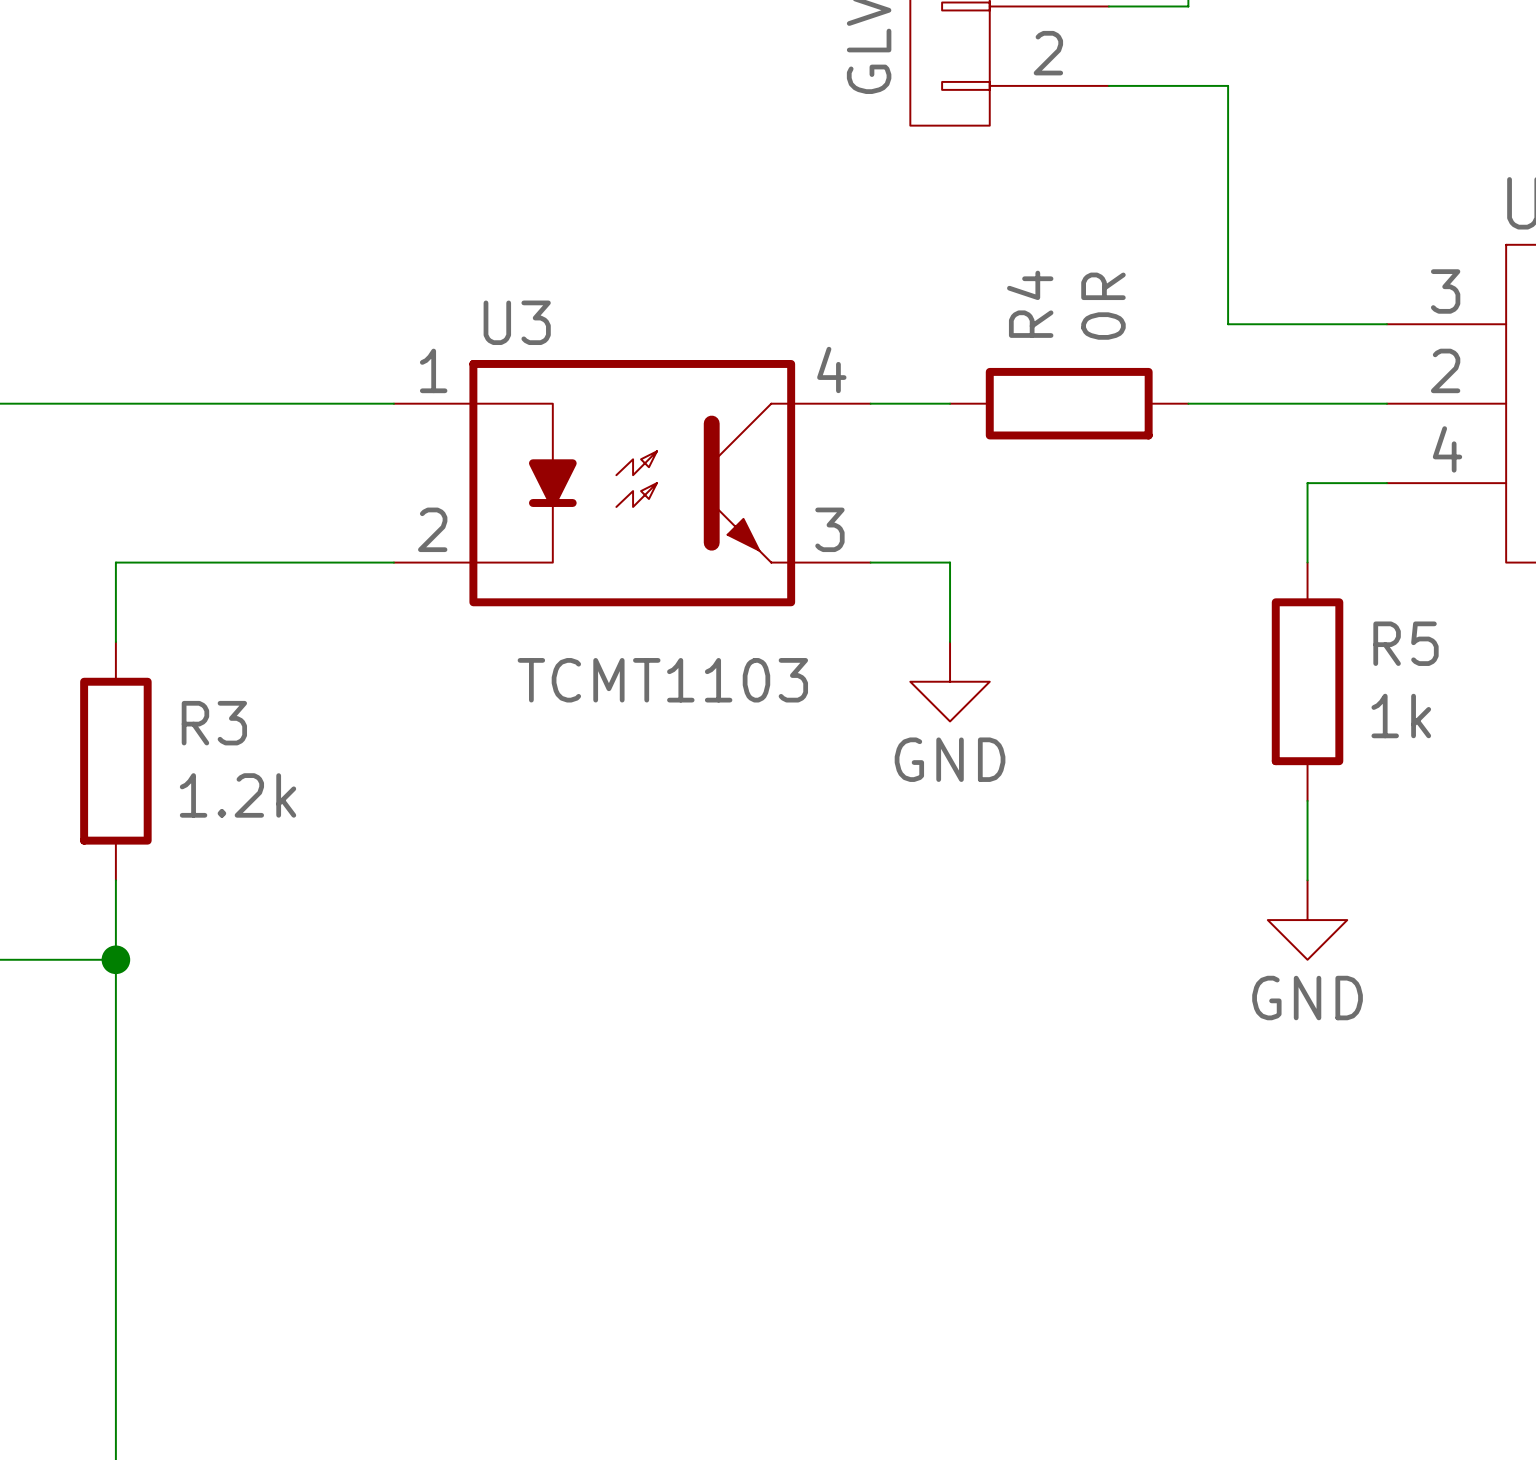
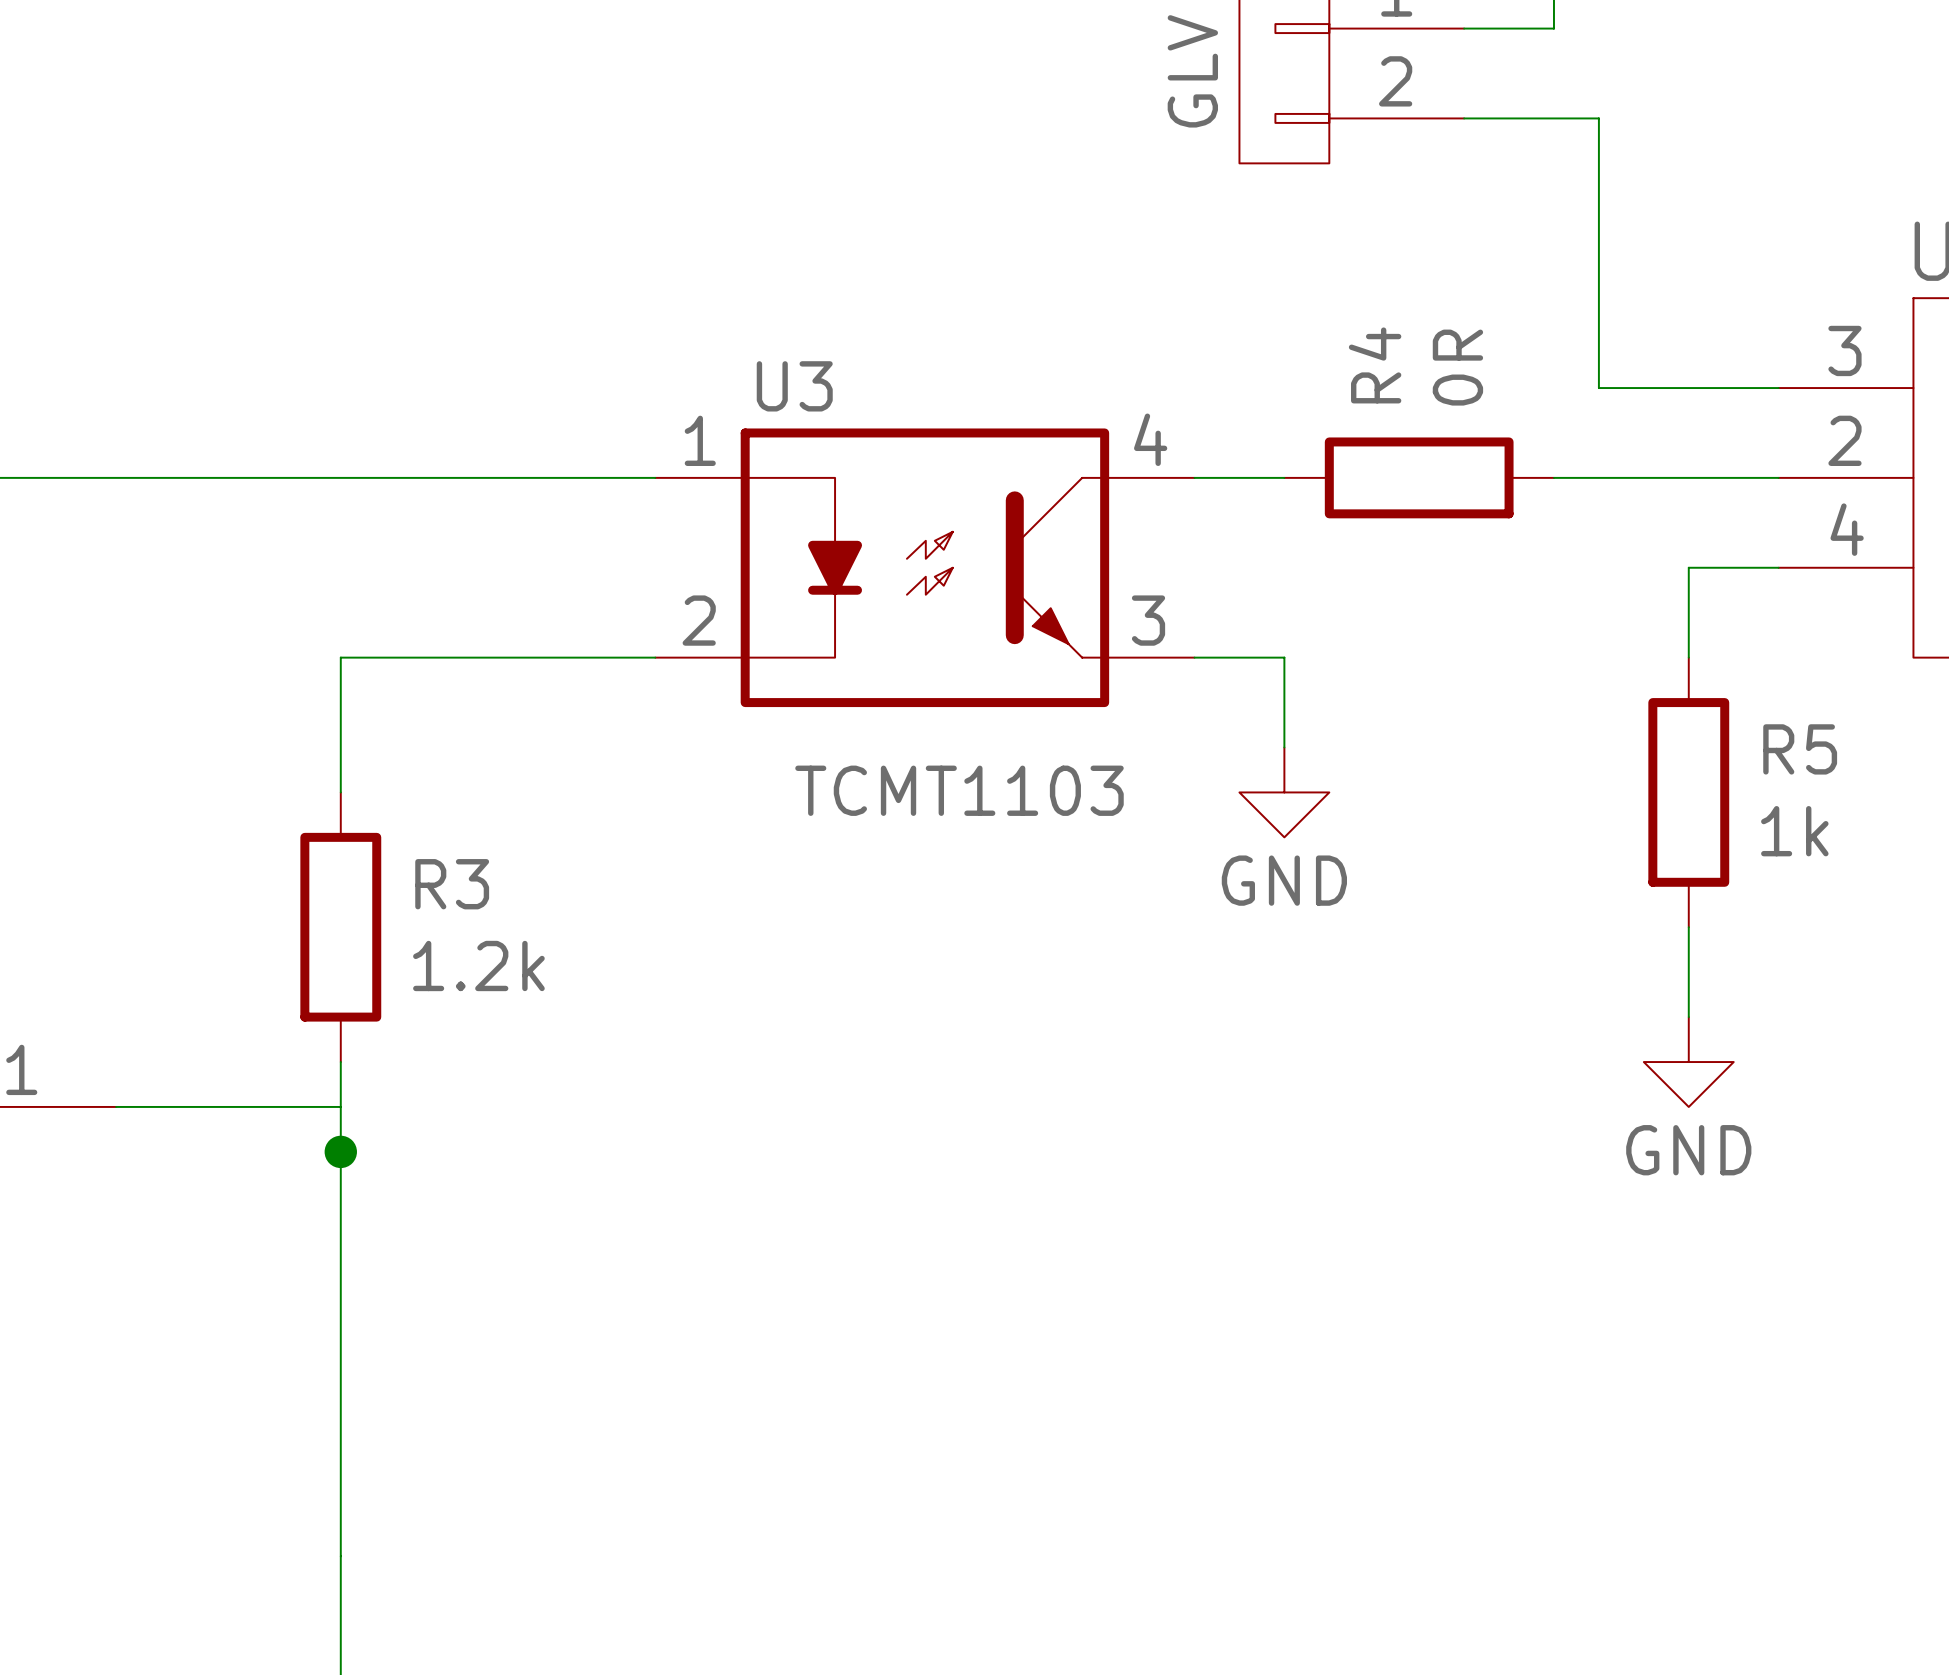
R3 position: (115, 761) -> (340, 927)
junction position: (115, 959) -> (340, 1151)

